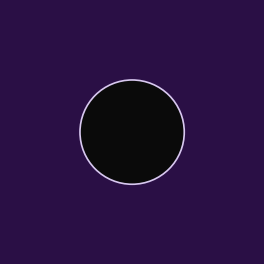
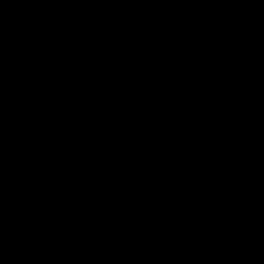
part: (132, 132) -> none

